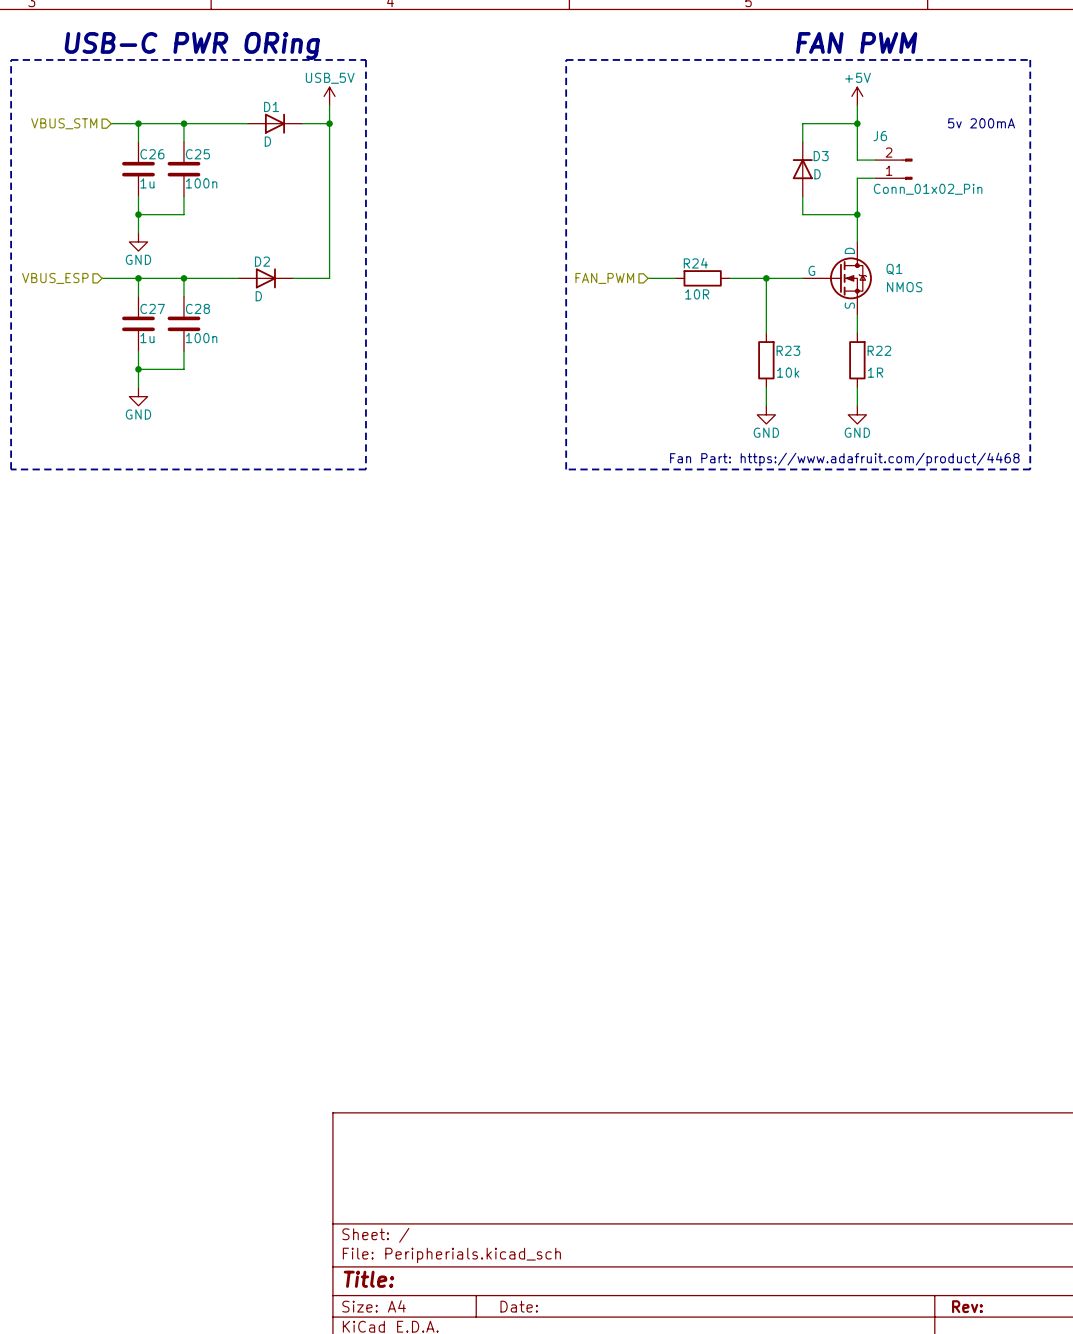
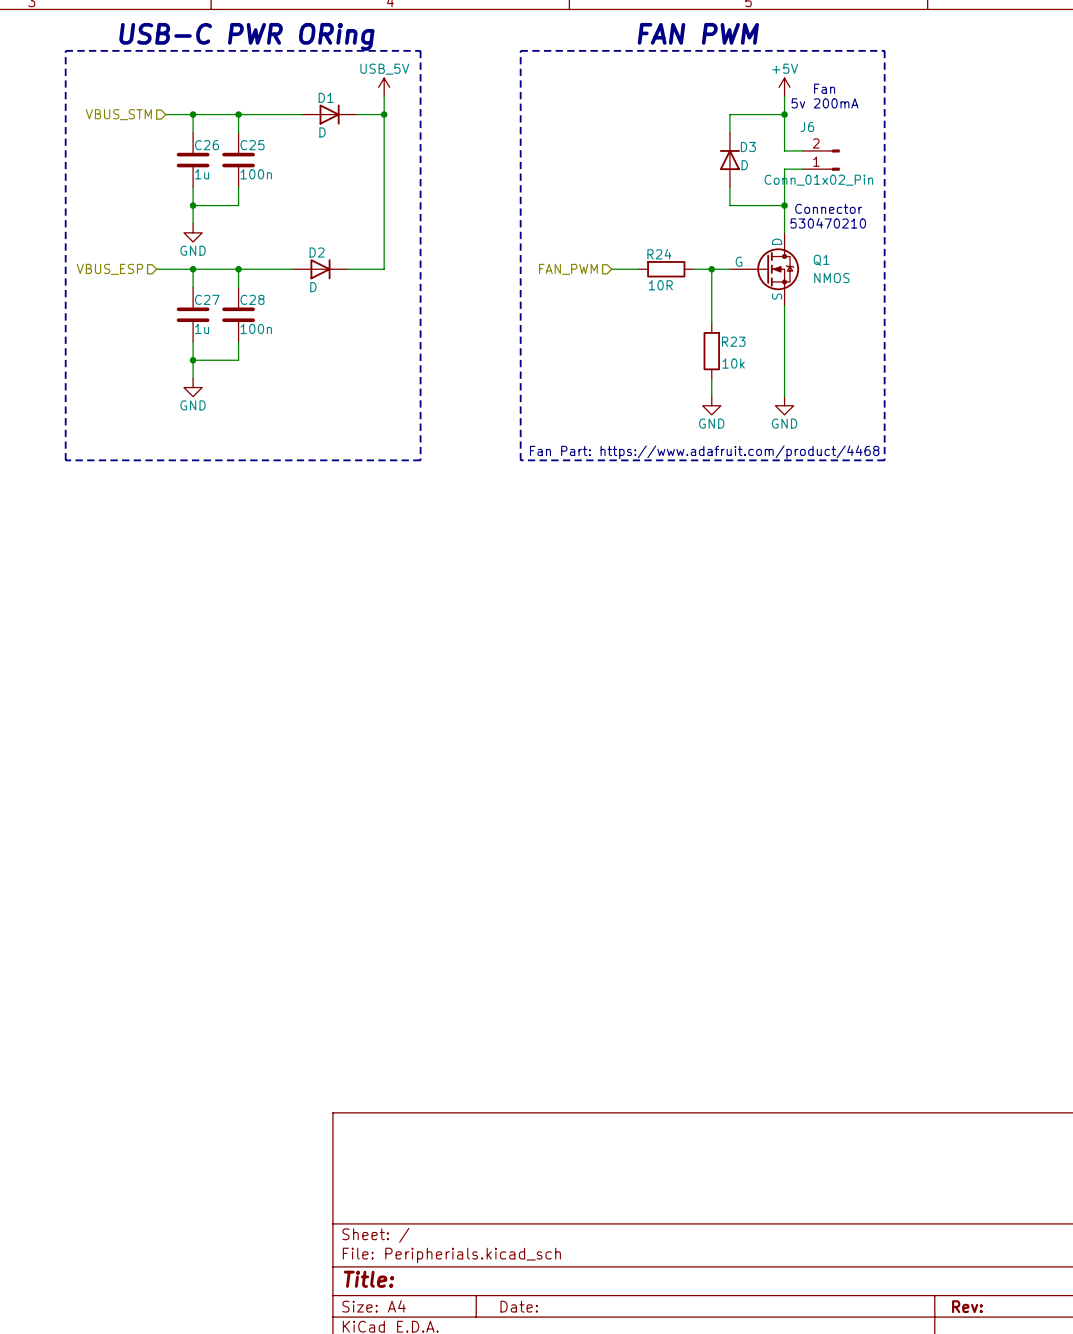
text position: FAN PWM (856, 42) -> FAN PWM (698, 33)
text position: USB-C PWR ORing (192, 45) -> USB-C PWR ORing (246, 36)
line: (11, 59) (365, 59) (365, 469) (11, 469) (11, 59) -> (65, 50) (420, 50) (420, 460) (65, 460) (65, 50)
line: (566, 59) (1030, 59) (1030, 469) (566, 469) (566, 59) -> (520, 50) (520, 460) (884, 460) (884, 50) (520, 50)
text: none -> Fan (824, 88)
power symbol position: USB_5V (329, 96) -> USB_5V (384, 87)
power symbol position: +5V (857, 96) -> +5V (784, 87)
wire: (329, 105) (329, 278) (293, 278) -> (384, 96) (384, 269) (347, 269)
wire: (857, 105) (857, 160) (875, 160) -> (784, 96) (784, 150) (802, 150)
junction: none -> (238, 114)
junction: none -> (384, 114)
junction: none -> (784, 114)
hierarchical label position: VBUS_STM (64, 123) -> VBUS_STM (118, 114)
wire: (111, 123) (247, 123) -> (165, 114) (302, 114)
wire: (138, 123) (138, 141) -> (193, 114) (193, 132)
junction: (138, 123) -> none
wire: (183, 123) (183, 141) -> (238, 114) (238, 132)
junction position: (183, 123) -> (193, 114)
D1 position: (274, 123) -> (329, 114)
wire: (302, 123) (329, 123) -> (356, 114) (384, 114)
junction: (329, 123) -> none
wire: (857, 123) (802, 123) (802, 141) -> (784, 114) (729, 114) (729, 132)
junction: (857, 123) -> none
text position: 5v 200mA (981, 123) -> 5v 200mA (825, 103)
C26 position: (138, 169) -> (193, 160)
C25 position: (183, 169) -> (238, 160)
D3 position: (802, 169) -> (729, 160)
J6 position: (894, 169) -> (821, 160)
wire: (875, 178) (857, 178) (857, 241) -> (802, 169) (784, 169) (784, 232)
J6 value position: Conn_01x02_Pin (928, 189) -> Conn_01x02_Pin (818, 180)
wire: (138, 196) (138, 232) -> (193, 187) (193, 223)
wire: (183, 196) (183, 214) (138, 214) -> (238, 187) (238, 205) (193, 205)
wire: (802, 196) (802, 214) (857, 214) -> (729, 187) (729, 205) (784, 205)
junction: none -> (193, 205)
junction: none -> (784, 205)
text: none -> Connector (828, 208)
junction: (138, 214) -> none
junction: (857, 214) -> none
text: none -> 530470210 (828, 223)
power symbol position: GND (138, 241) -> GND (193, 232)
junction: none -> (238, 269)
wire: none -> (693, 269) (729, 269)
junction: none -> (711, 269)
hierarchical label position: VBUS_ESP (55, 278) -> VBUS_ESP (109, 269)
wire: (102, 278) (238, 278) -> (156, 269) (293, 269)
wire: (138, 278) (138, 296) -> (193, 269) (193, 287)
junction: (138, 278) -> none
wire: (183, 278) (183, 296) -> (238, 269) (238, 287)
junction position: (183, 278) -> (193, 269)
D2 position: (265, 278) -> (320, 269)
hierarchical label position: FAN_PWM (604, 278) -> FAN_PWM (568, 269)
wire: (648, 278) (675, 278) -> (611, 269) (638, 269)
R24 position: (702, 278) -> (666, 269)
wire: (729, 278) (802, 278) -> none
wire: (766, 278) (766, 332) -> (711, 269) (711, 323)
junction: (766, 278) -> none
Q1 position: (837, 278) -> (764, 269)
wire: none -> (784, 305) (784, 396)
wire: (857, 314) (857, 332) -> none
C27 position: (138, 323) -> (193, 314)
C28 position: (183, 323) -> (238, 314)
wire: (138, 351) (138, 387) -> (193, 342) (193, 378)
wire: (183, 351) (183, 369) (138, 369) -> (238, 342) (238, 360) (193, 360)
junction: none -> (193, 360)
R23 position: (766, 360) -> (711, 351)
R22: 1R (857, 360) -> none
junction: (138, 369) -> none
wire: (766, 387) (766, 405) -> (711, 378) (711, 396)
wire: (857, 387) (857, 405) -> none
power symbol position: GND (138, 396) -> GND (193, 387)
power symbol: none -> GND (711, 405)
power symbol position: GND (766, 414) -> GND (784, 405)
power symbol: GND (857, 414) -> none
text position: Fan Part: https://www.adafruit.com/product/4468 (844, 459) -> Fan Part: https://www.adafruit.com/product/4468 (704, 452)

